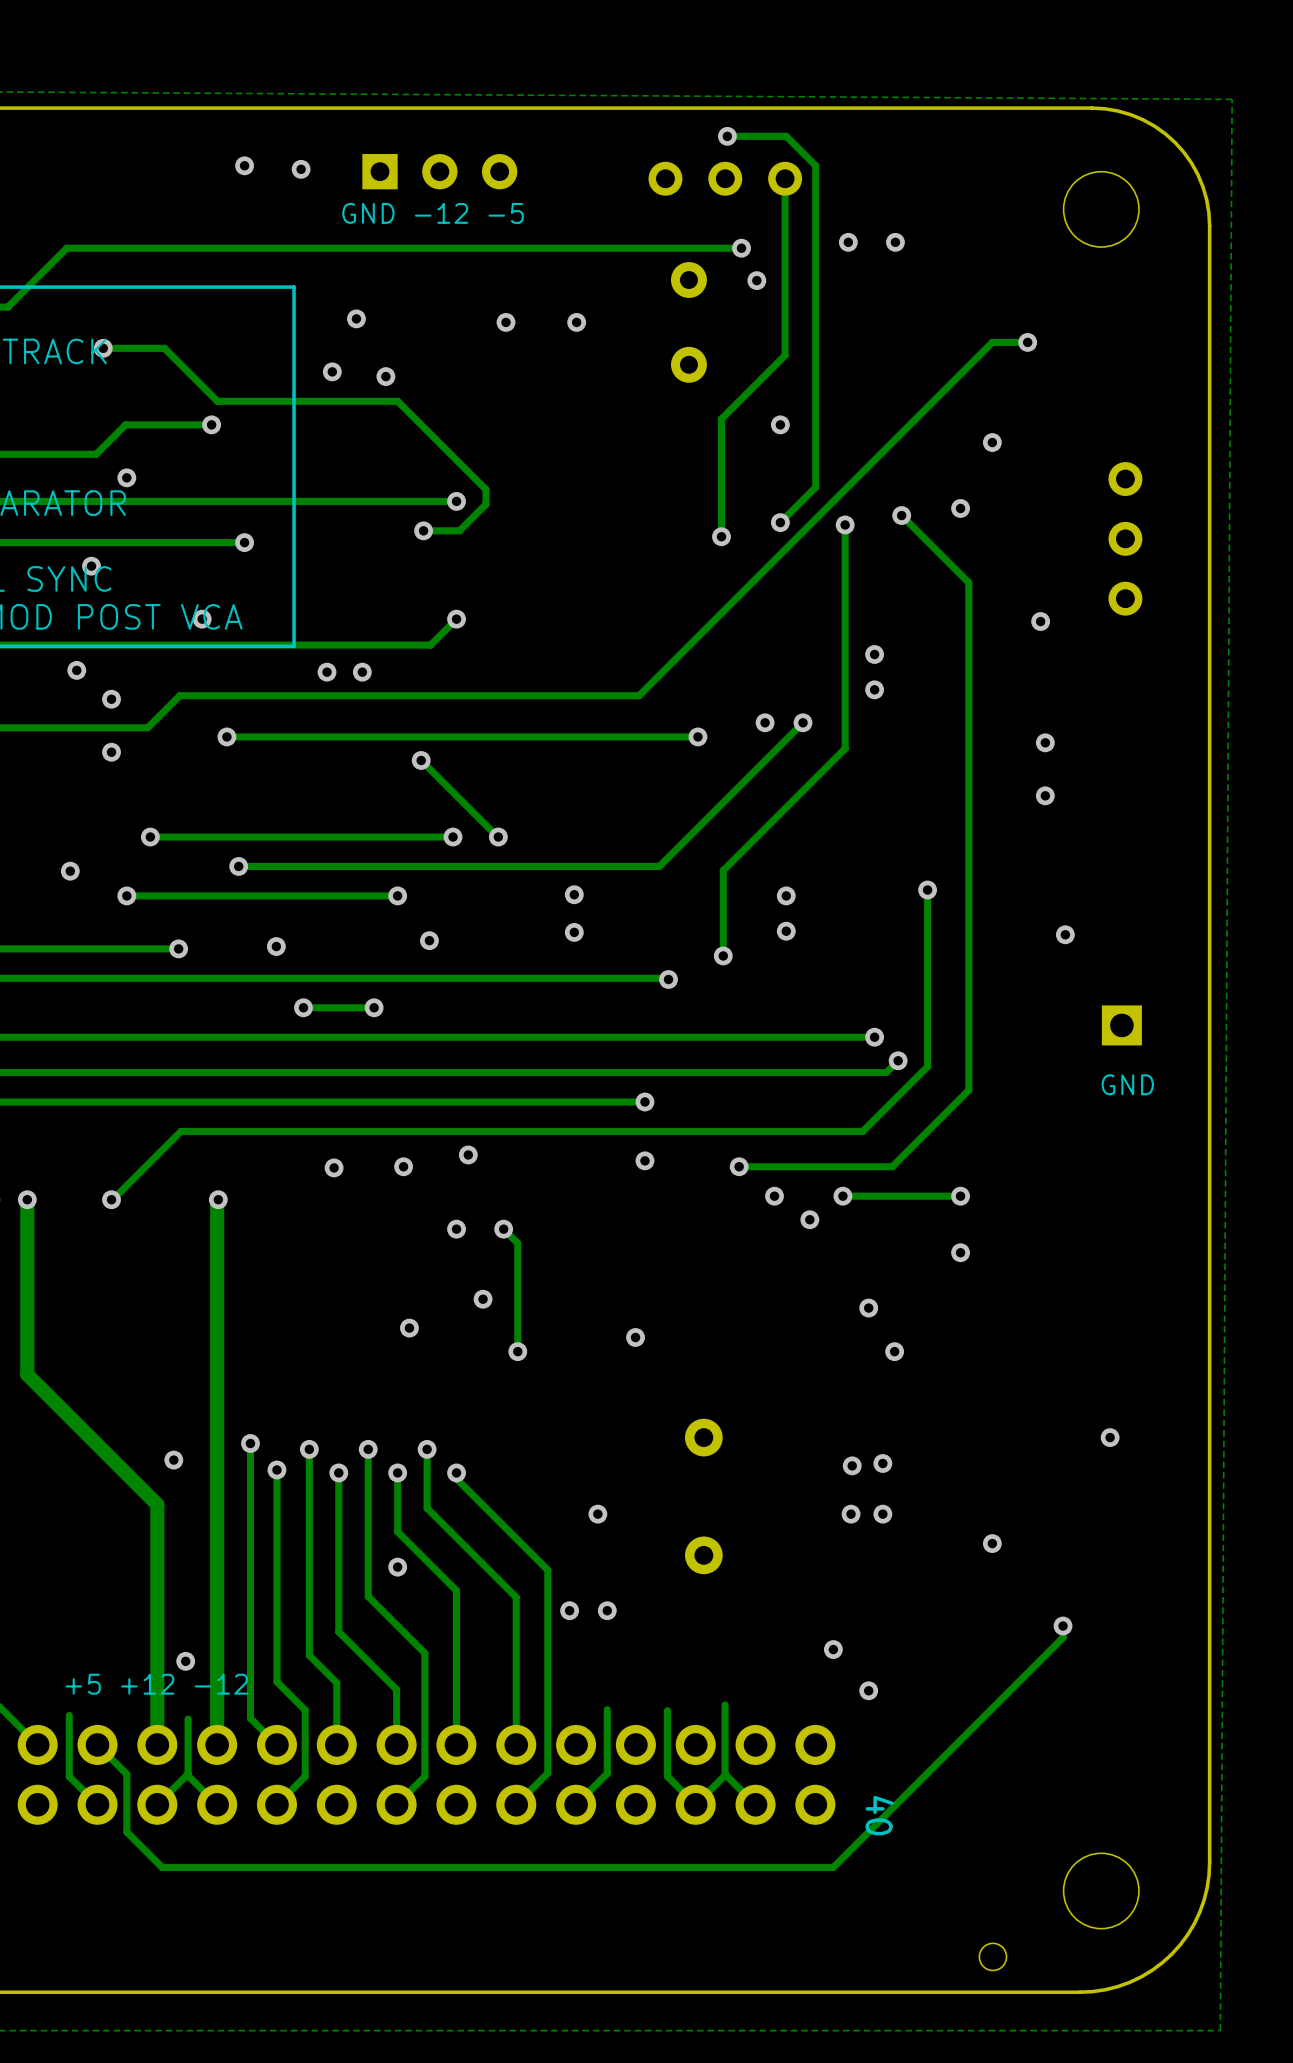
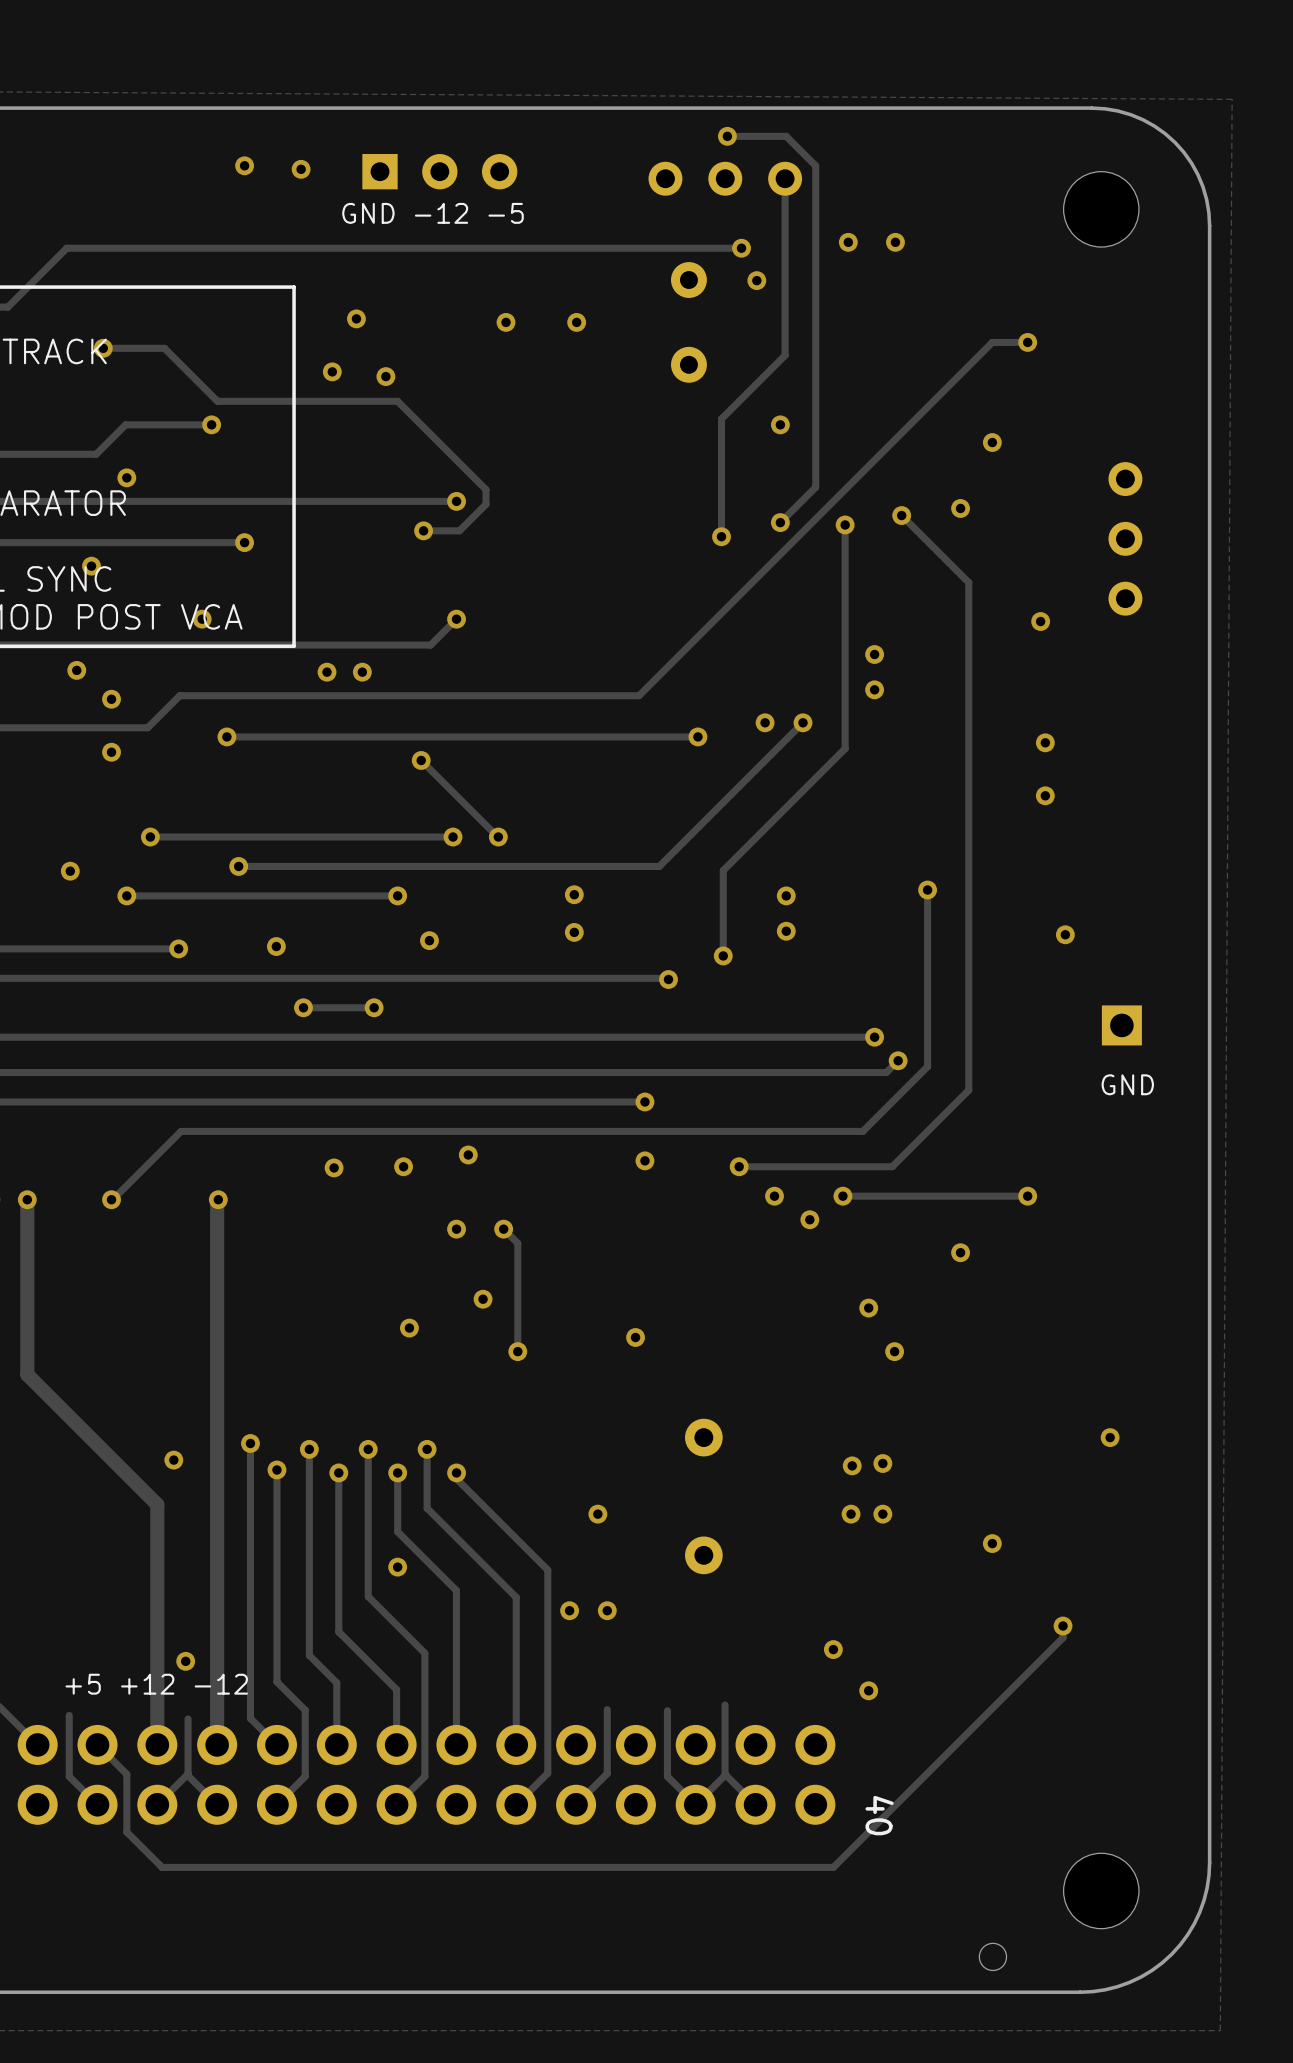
via position: (960, 1196) -> (1027, 1196)
track: none -> (1027, 1196) (960, 1196)

